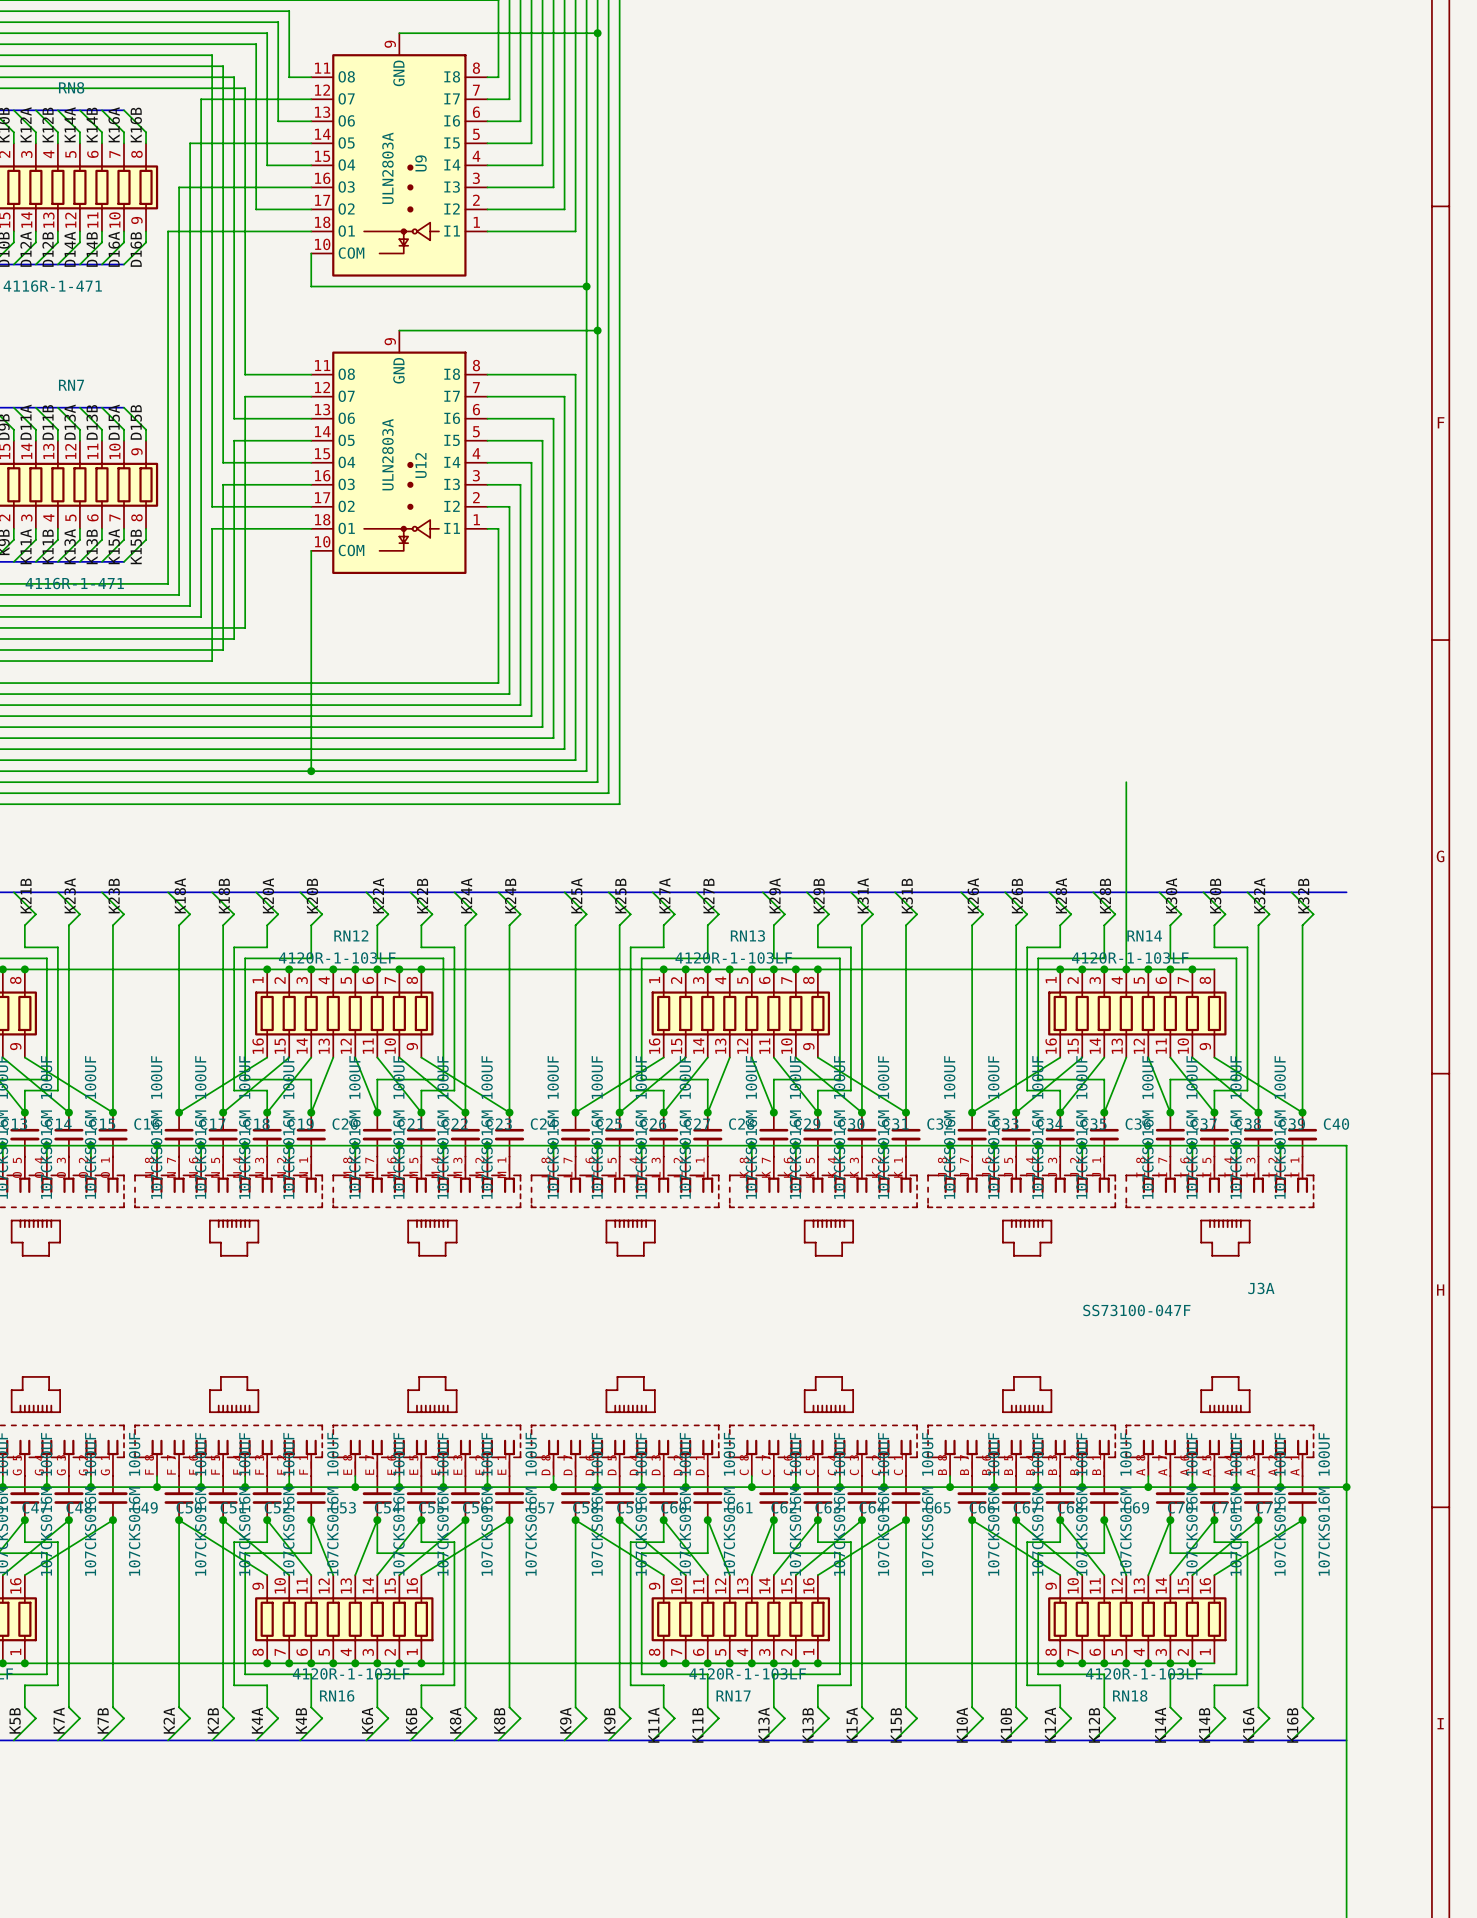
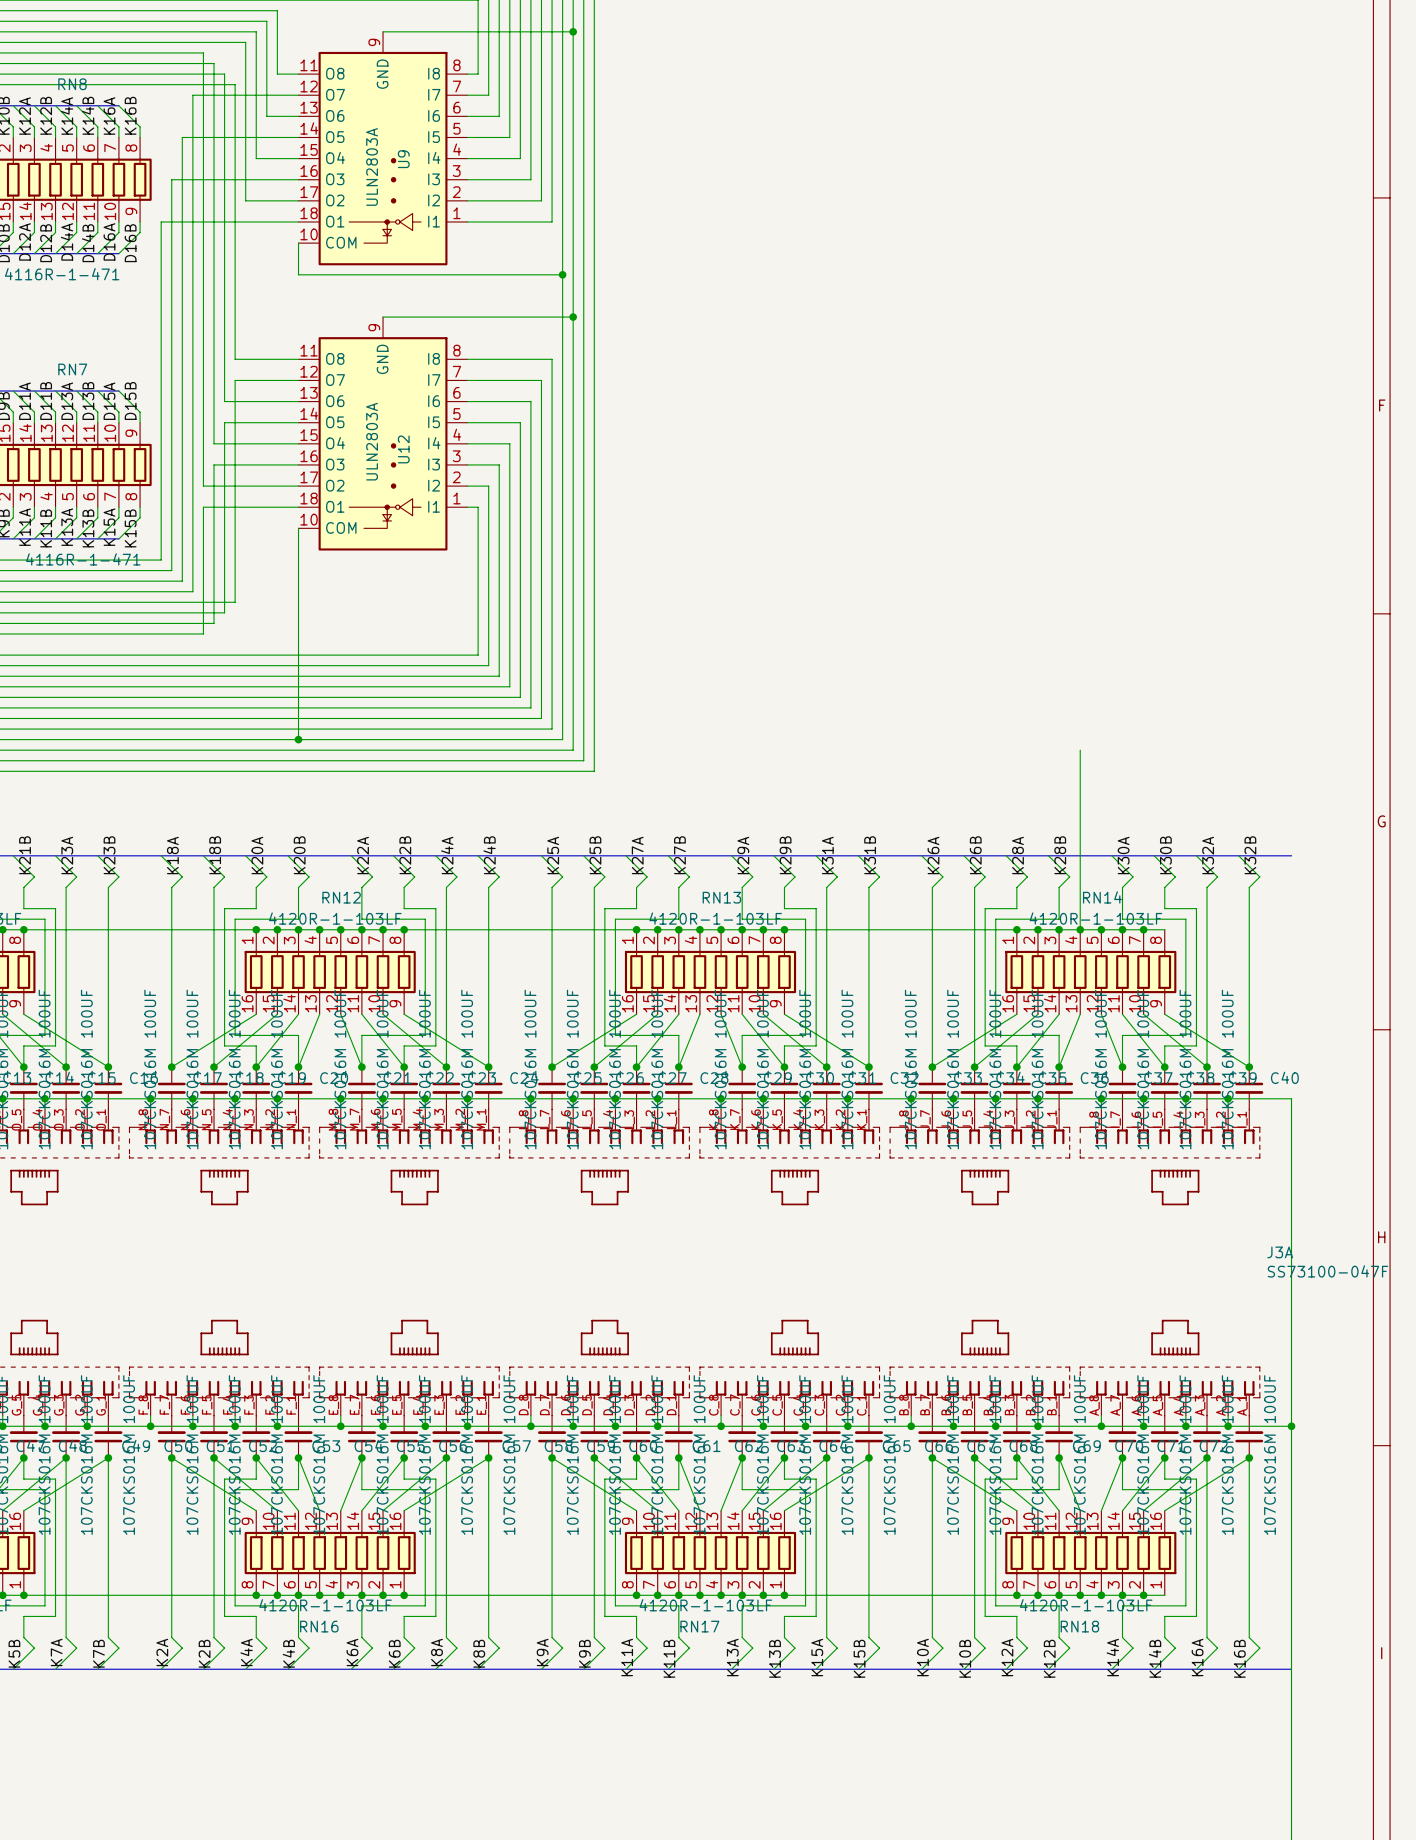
J3A name position: J3A (1261, 1288) -> J3A (1280, 1252)
J3A value position: SS73100-047F (1136, 1310) -> SS73100-047F (1327, 1271)

